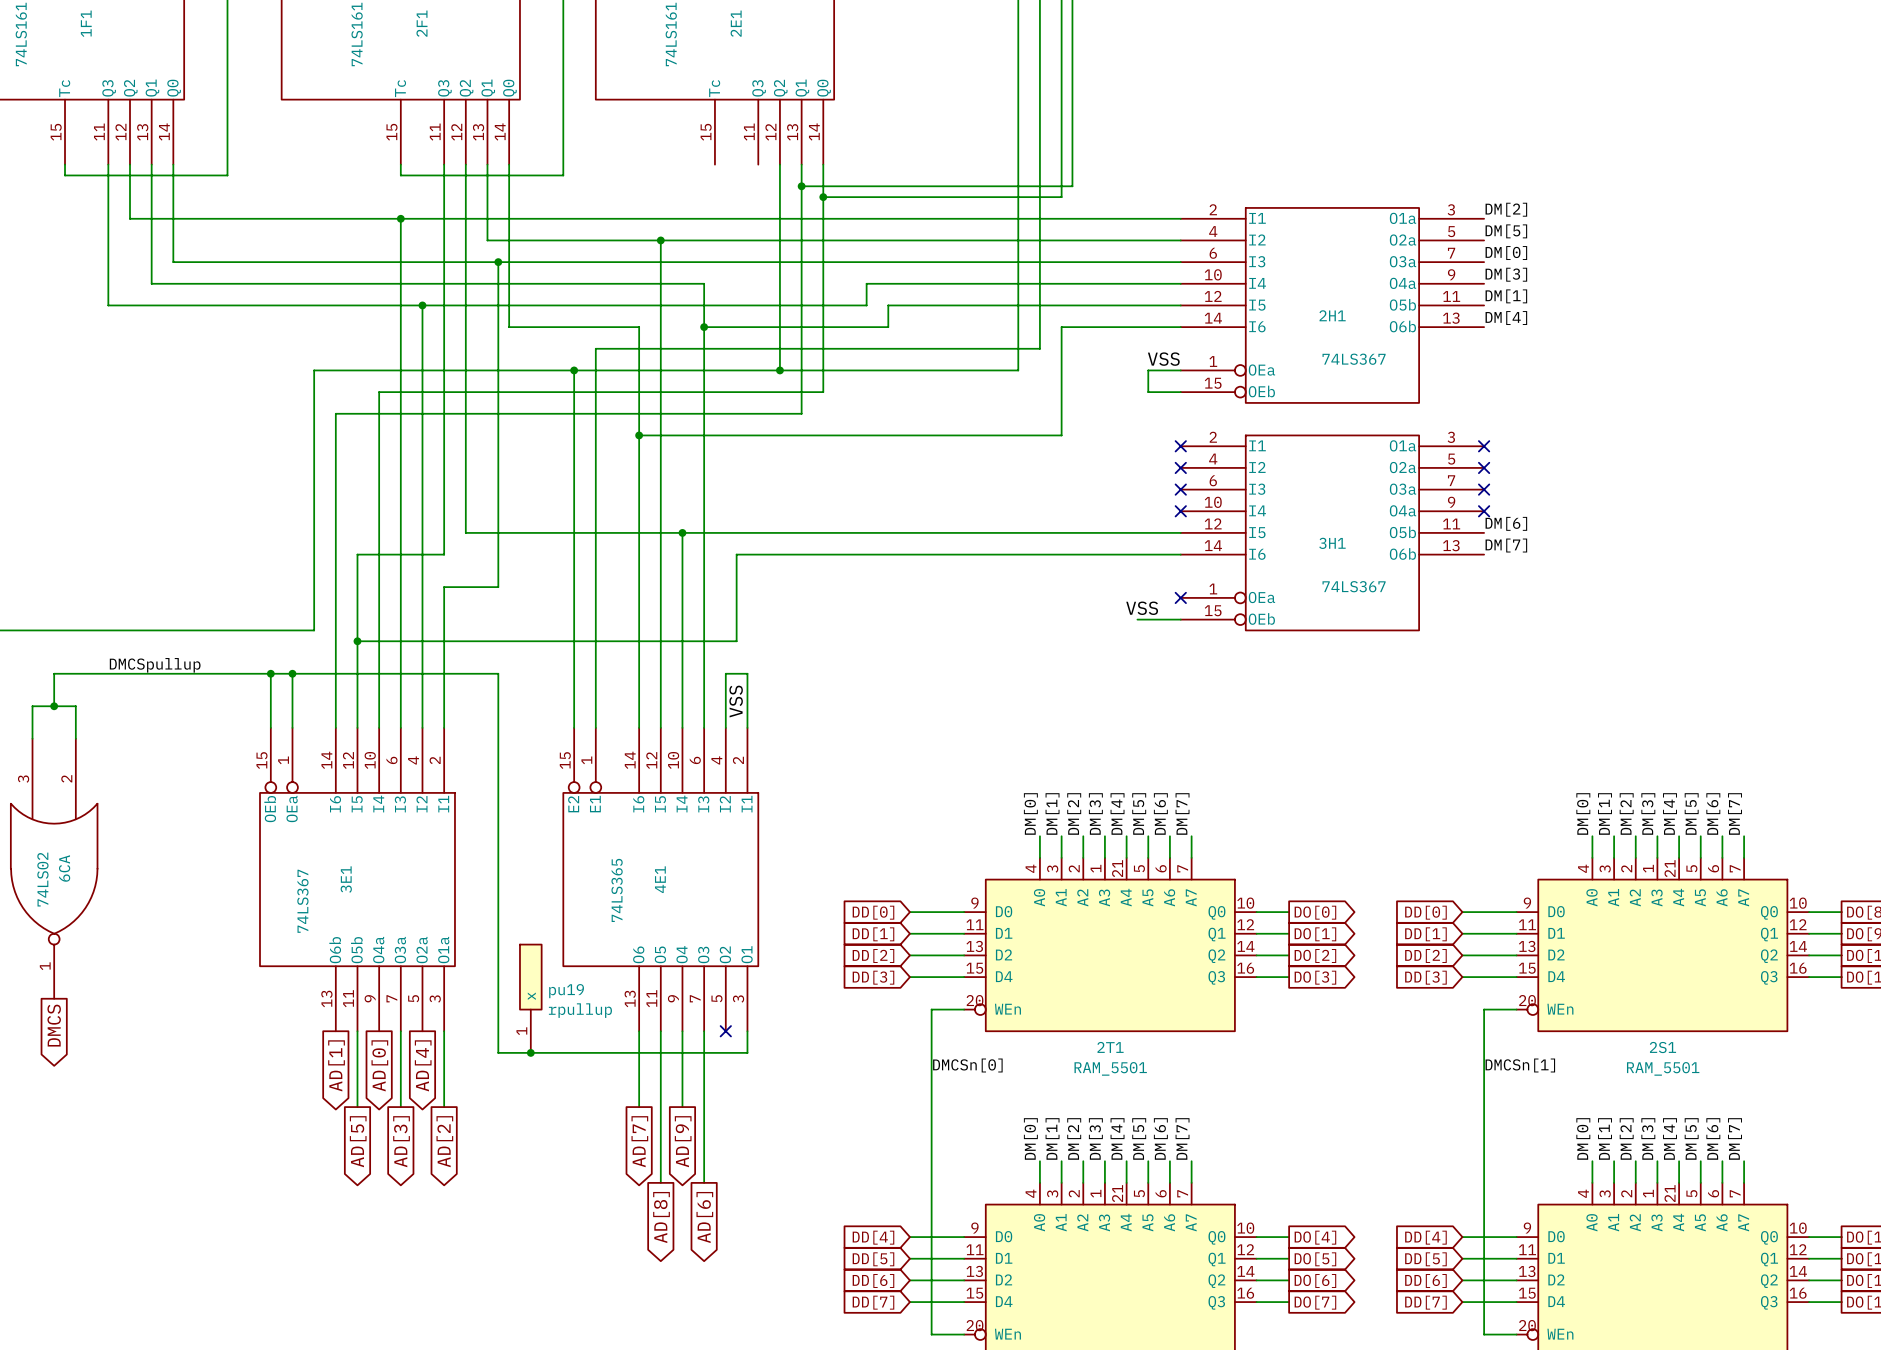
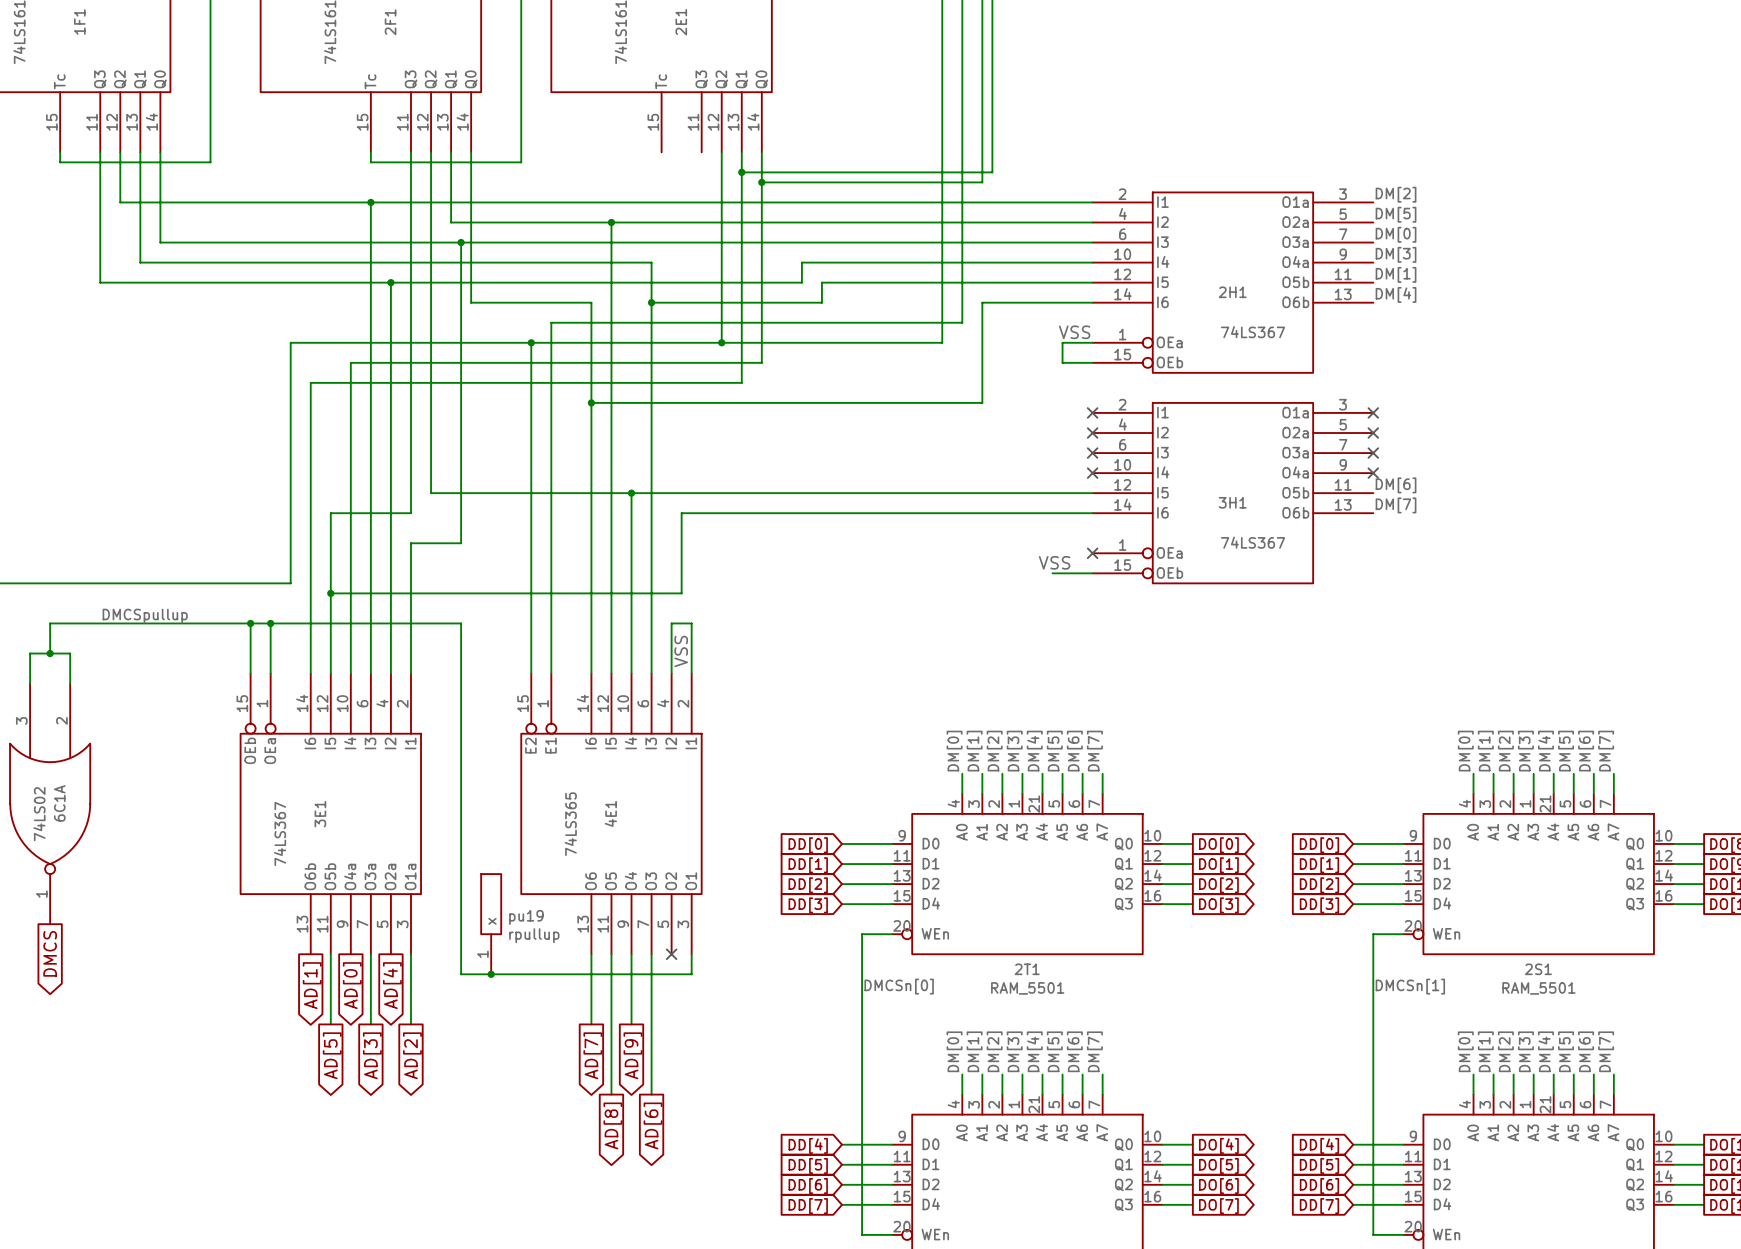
6CA name: 6CA (64, 868) -> 6C1A (59, 803)

